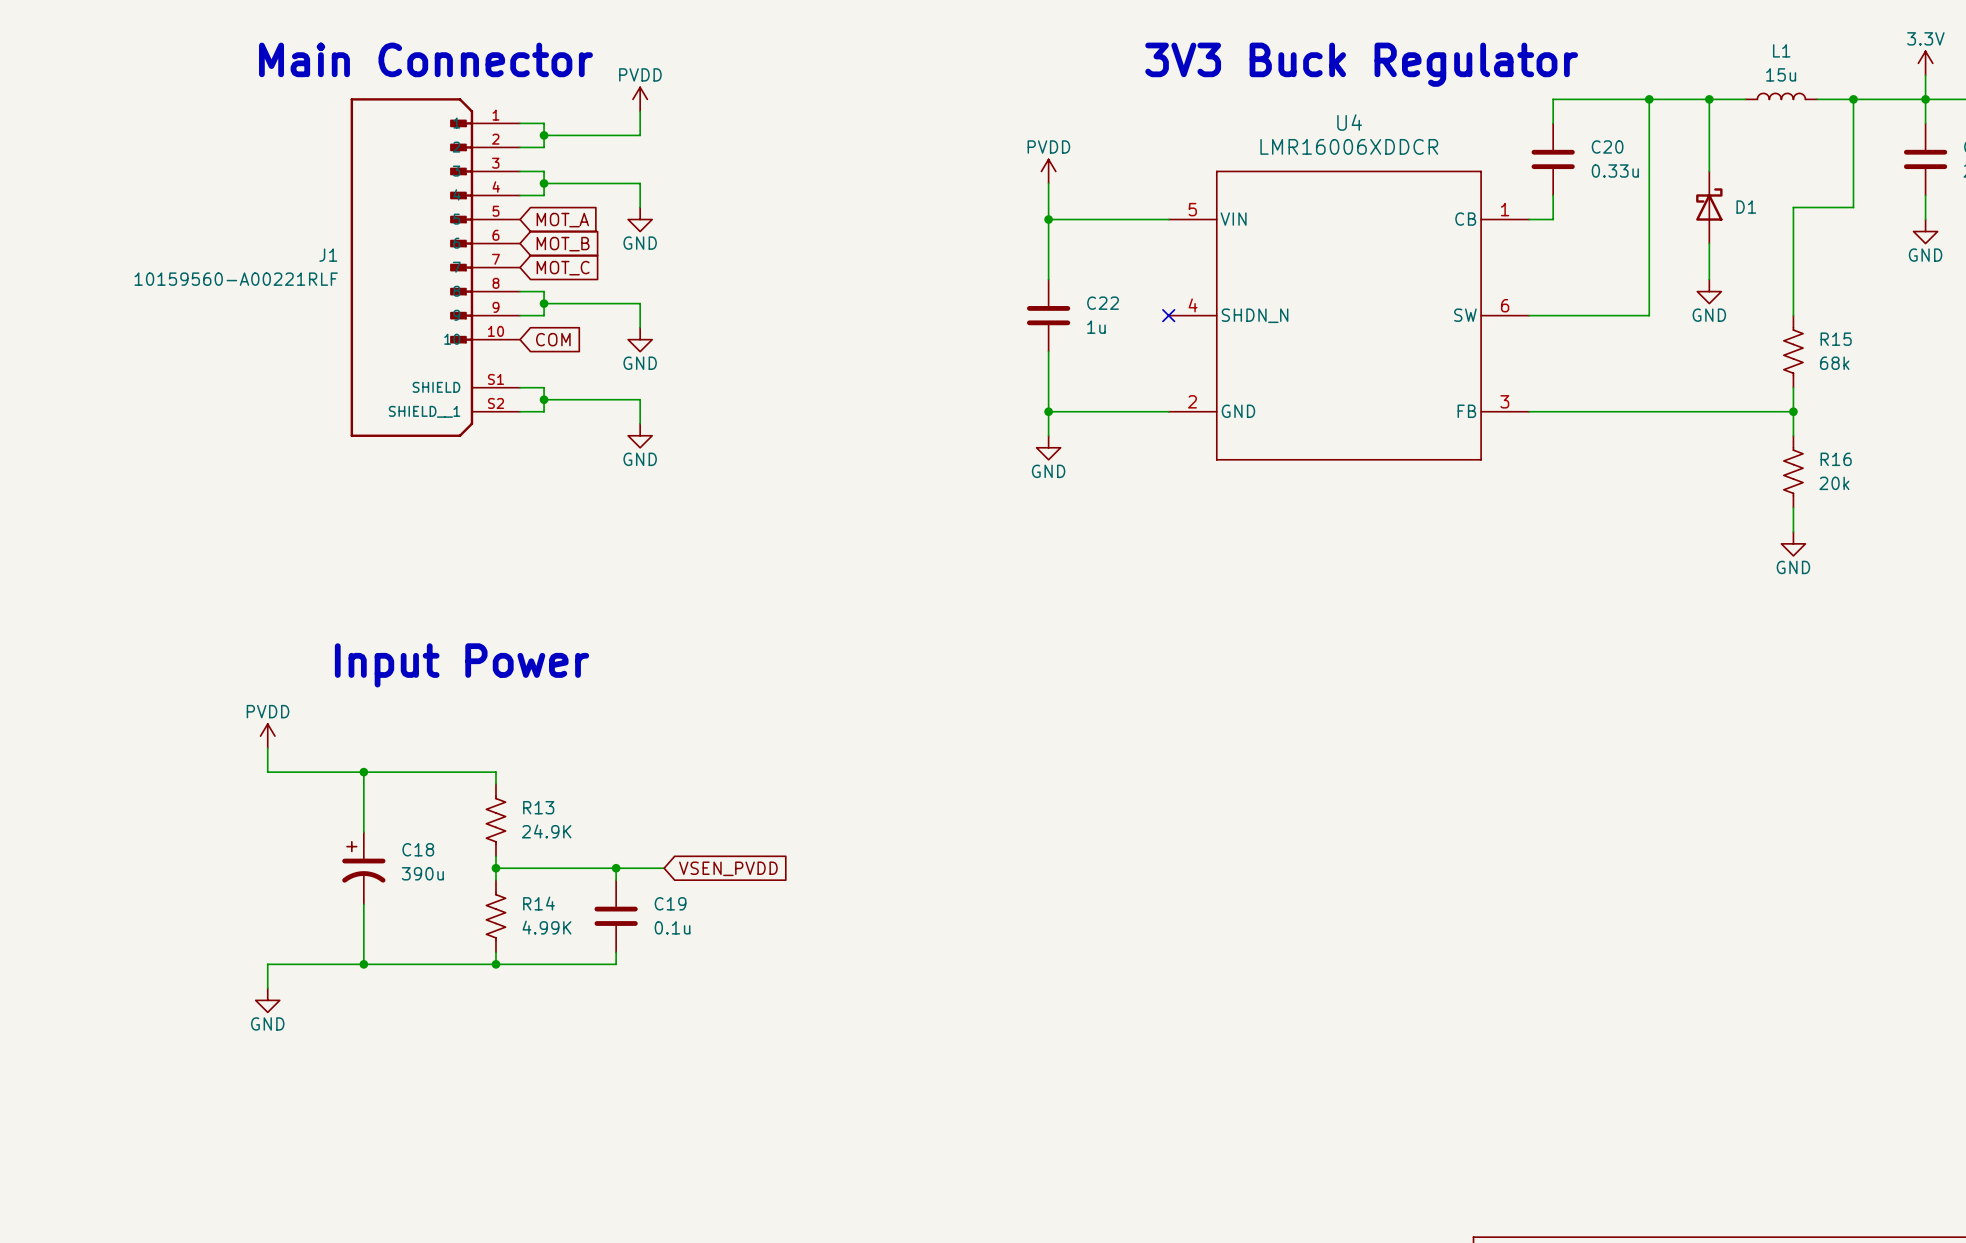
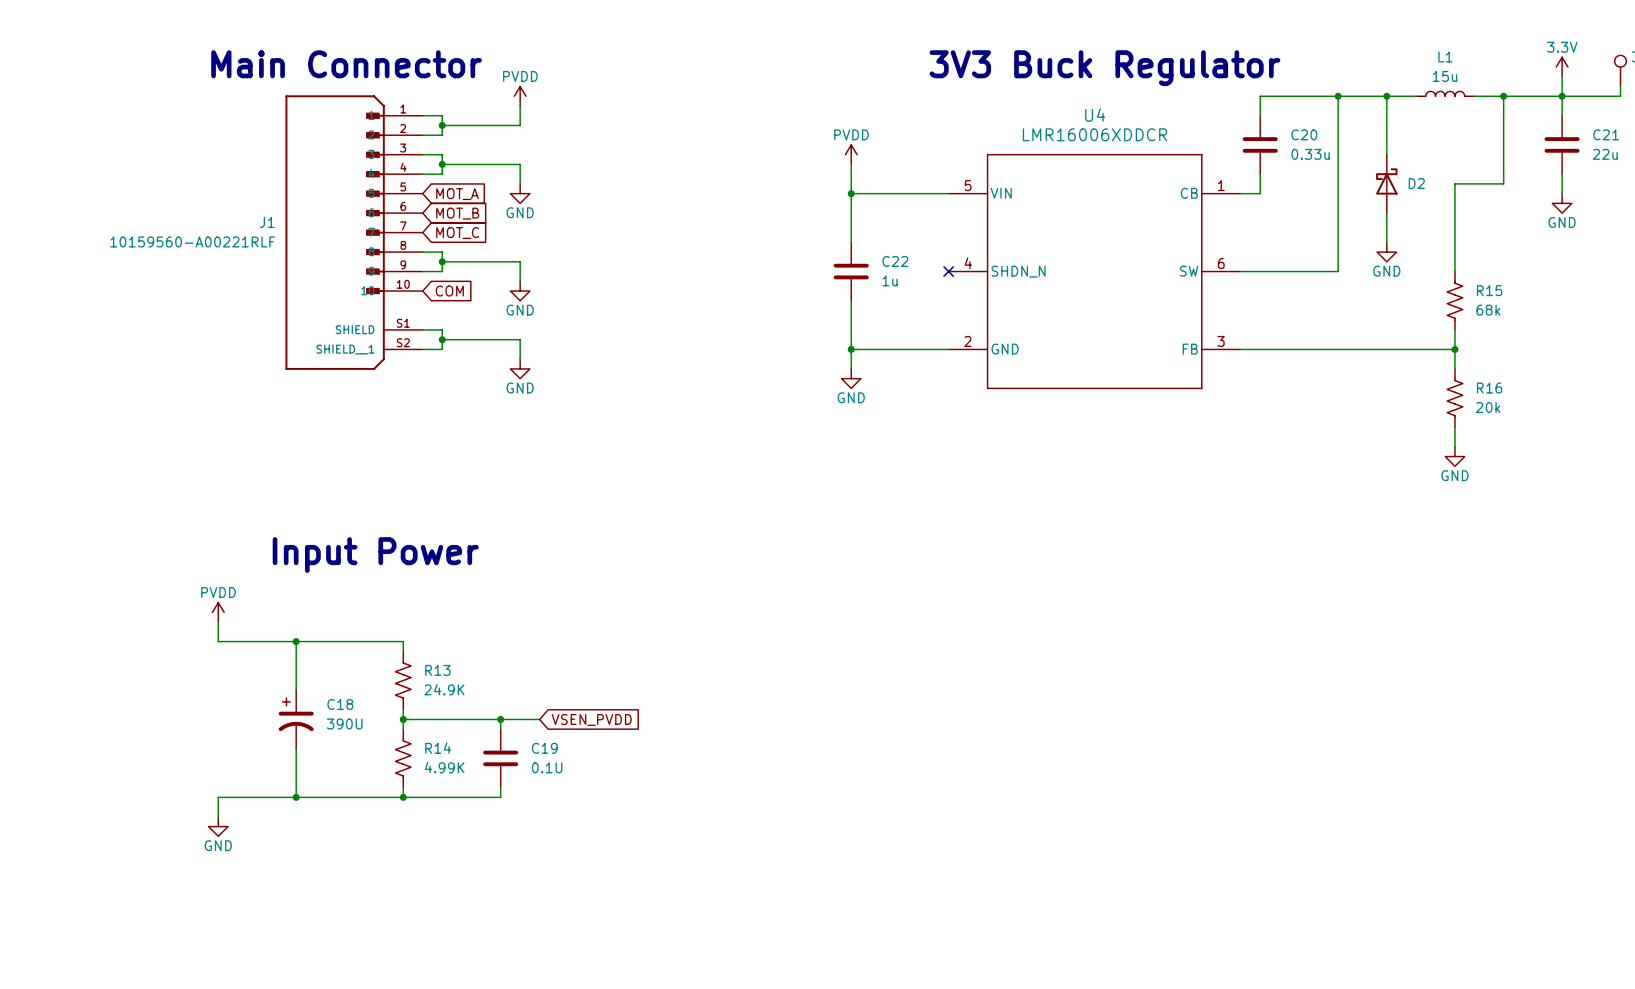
D1 name: D1 (1746, 207) -> D2 (1416, 183)
C18 value: 390u (422, 873) -> 390U (344, 723)
C19 value: 0.1u (672, 927) -> 0.1U (547, 767)

